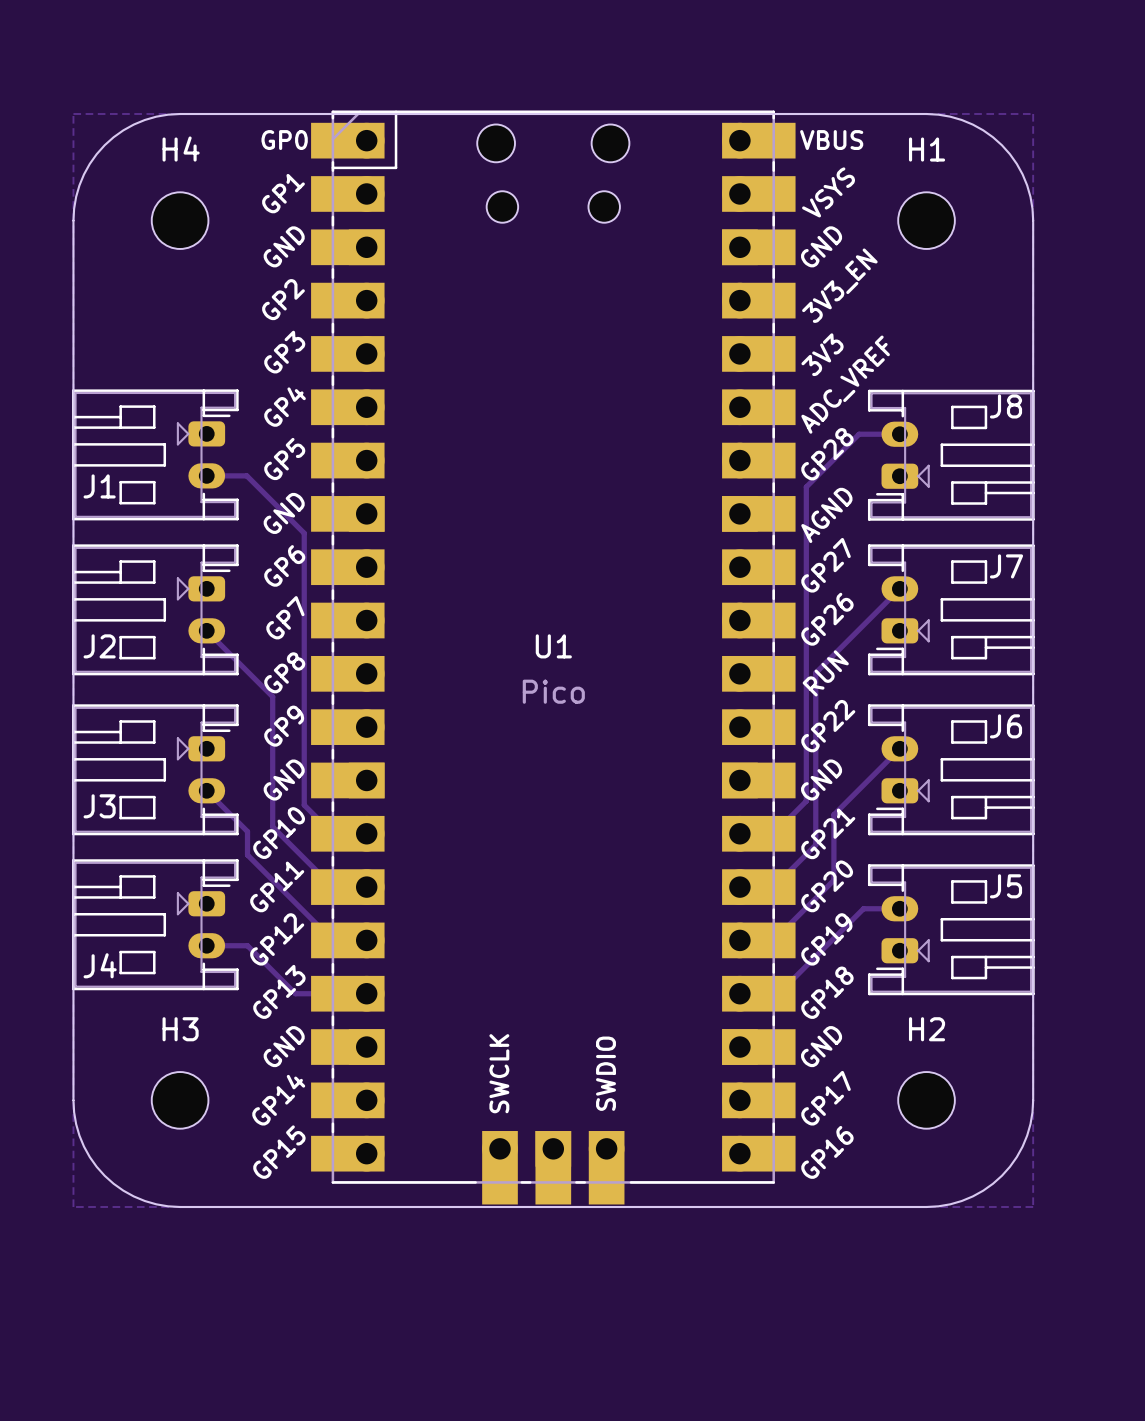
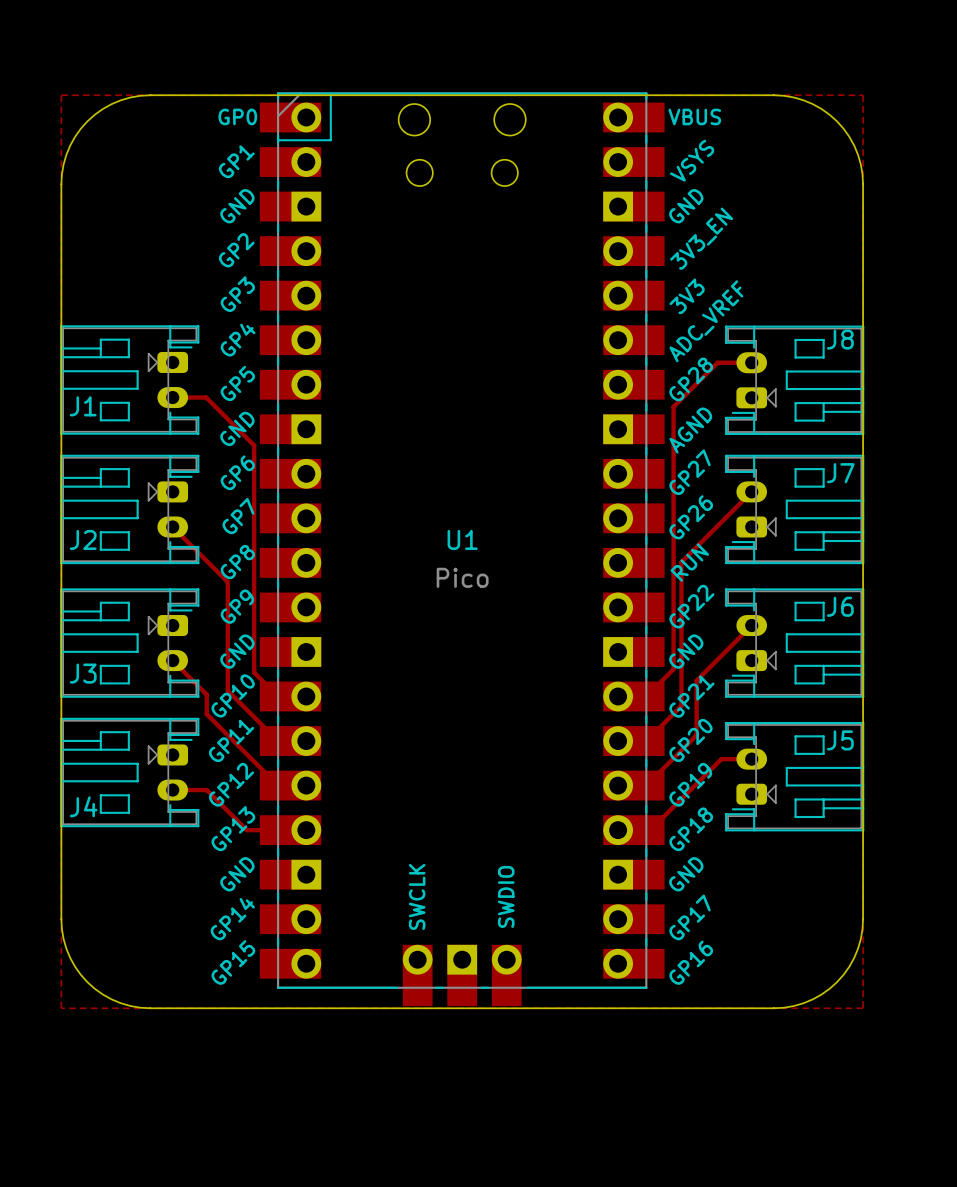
H4: (180, 220) -> none
H1: (926, 220) -> none
H3: (180, 1100) -> none
H2: (926, 1100) -> none

